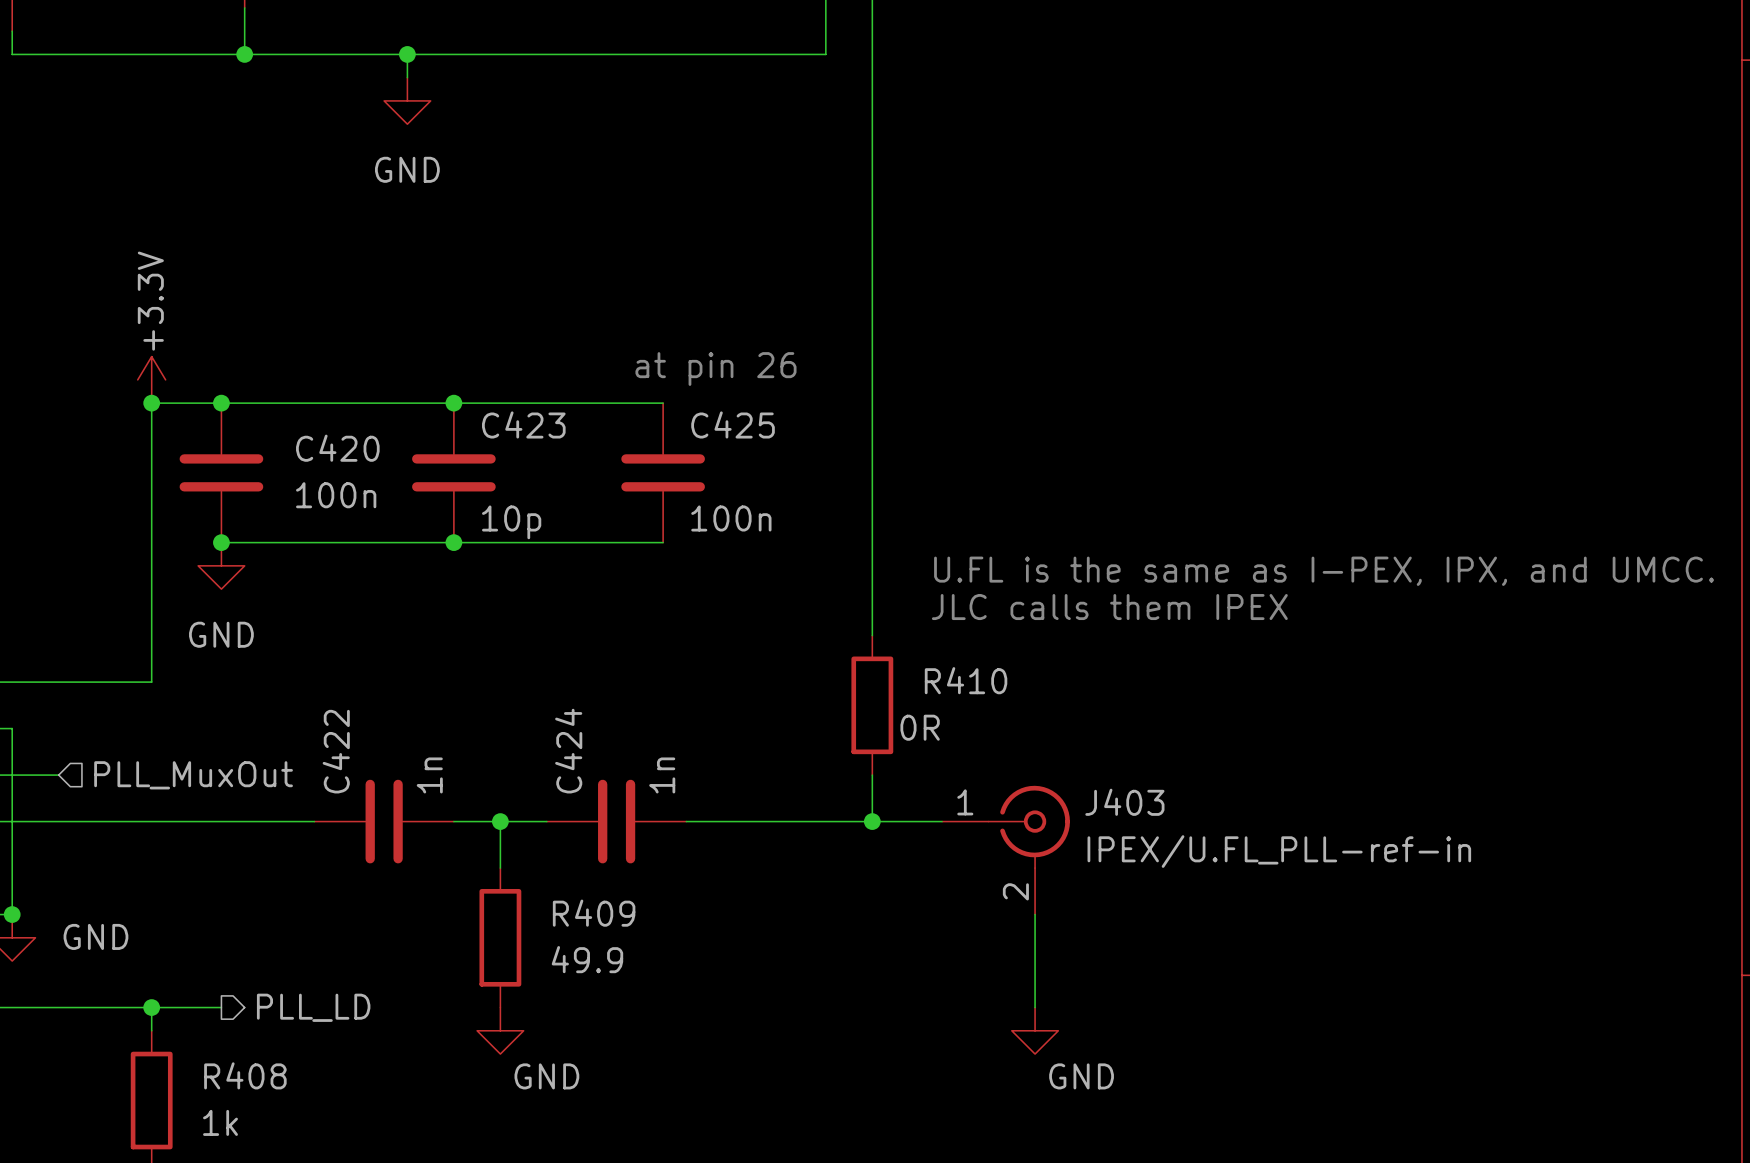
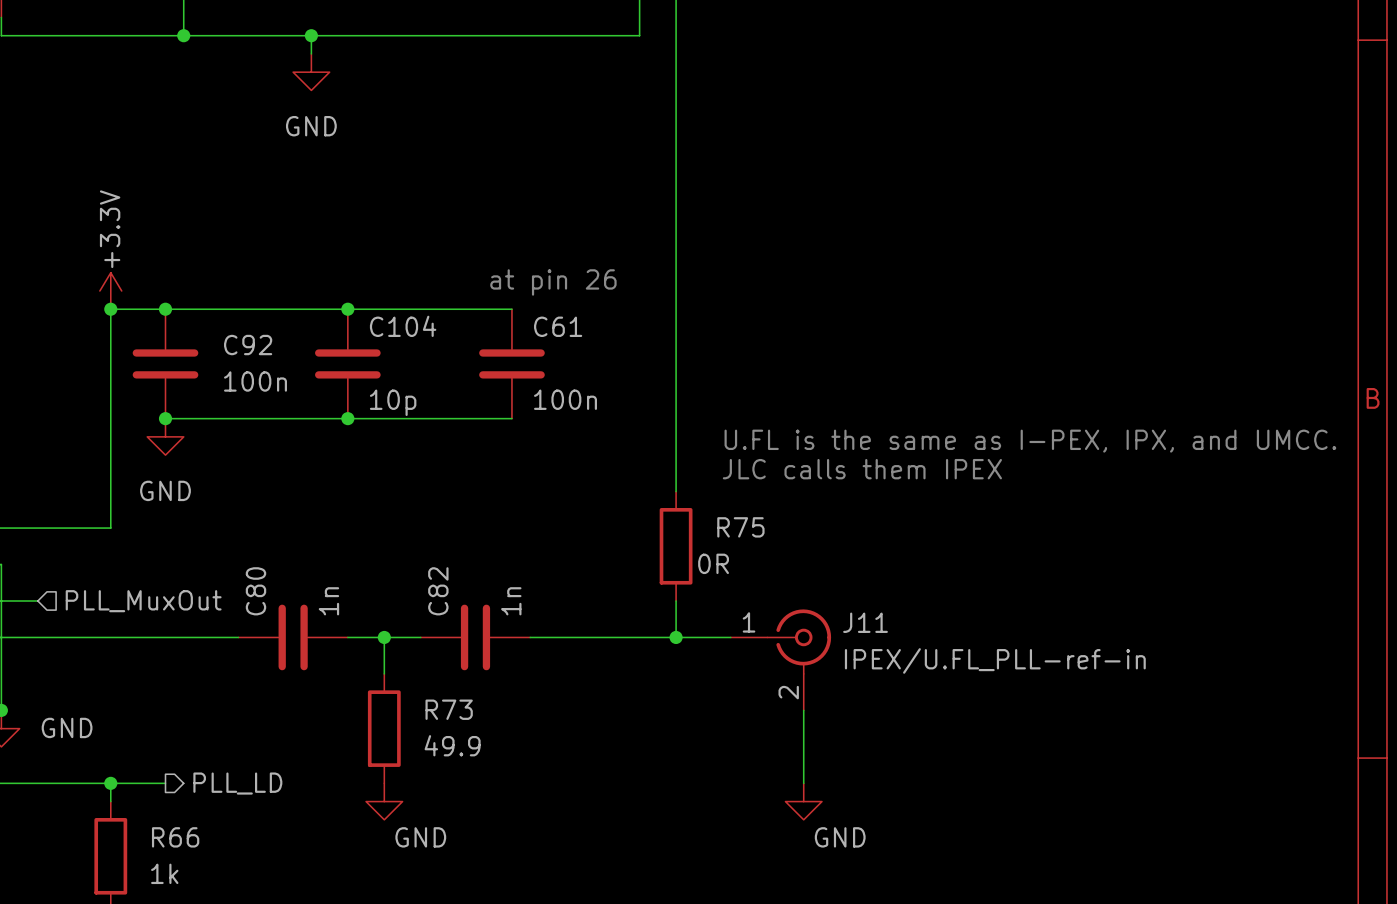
C423 name: C423 (523, 424) -> C104 (403, 326)
C425 name: C425 (733, 424) -> C61 (558, 326)
C420 name: C420 (337, 448) -> C92 (248, 345)
R410 name: R410 (966, 680) -> R75 (740, 527)
C422 name: C422 (336, 751) -> C80 (255, 591)
C424 name: C424 (568, 751) -> C82 (438, 591)
J403 name: J403 (1124, 802) -> J11 (865, 622)
R409 name: R409 (594, 913) -> R73 (449, 709)
R408 name: R408 (245, 1075) -> R66 (175, 837)

